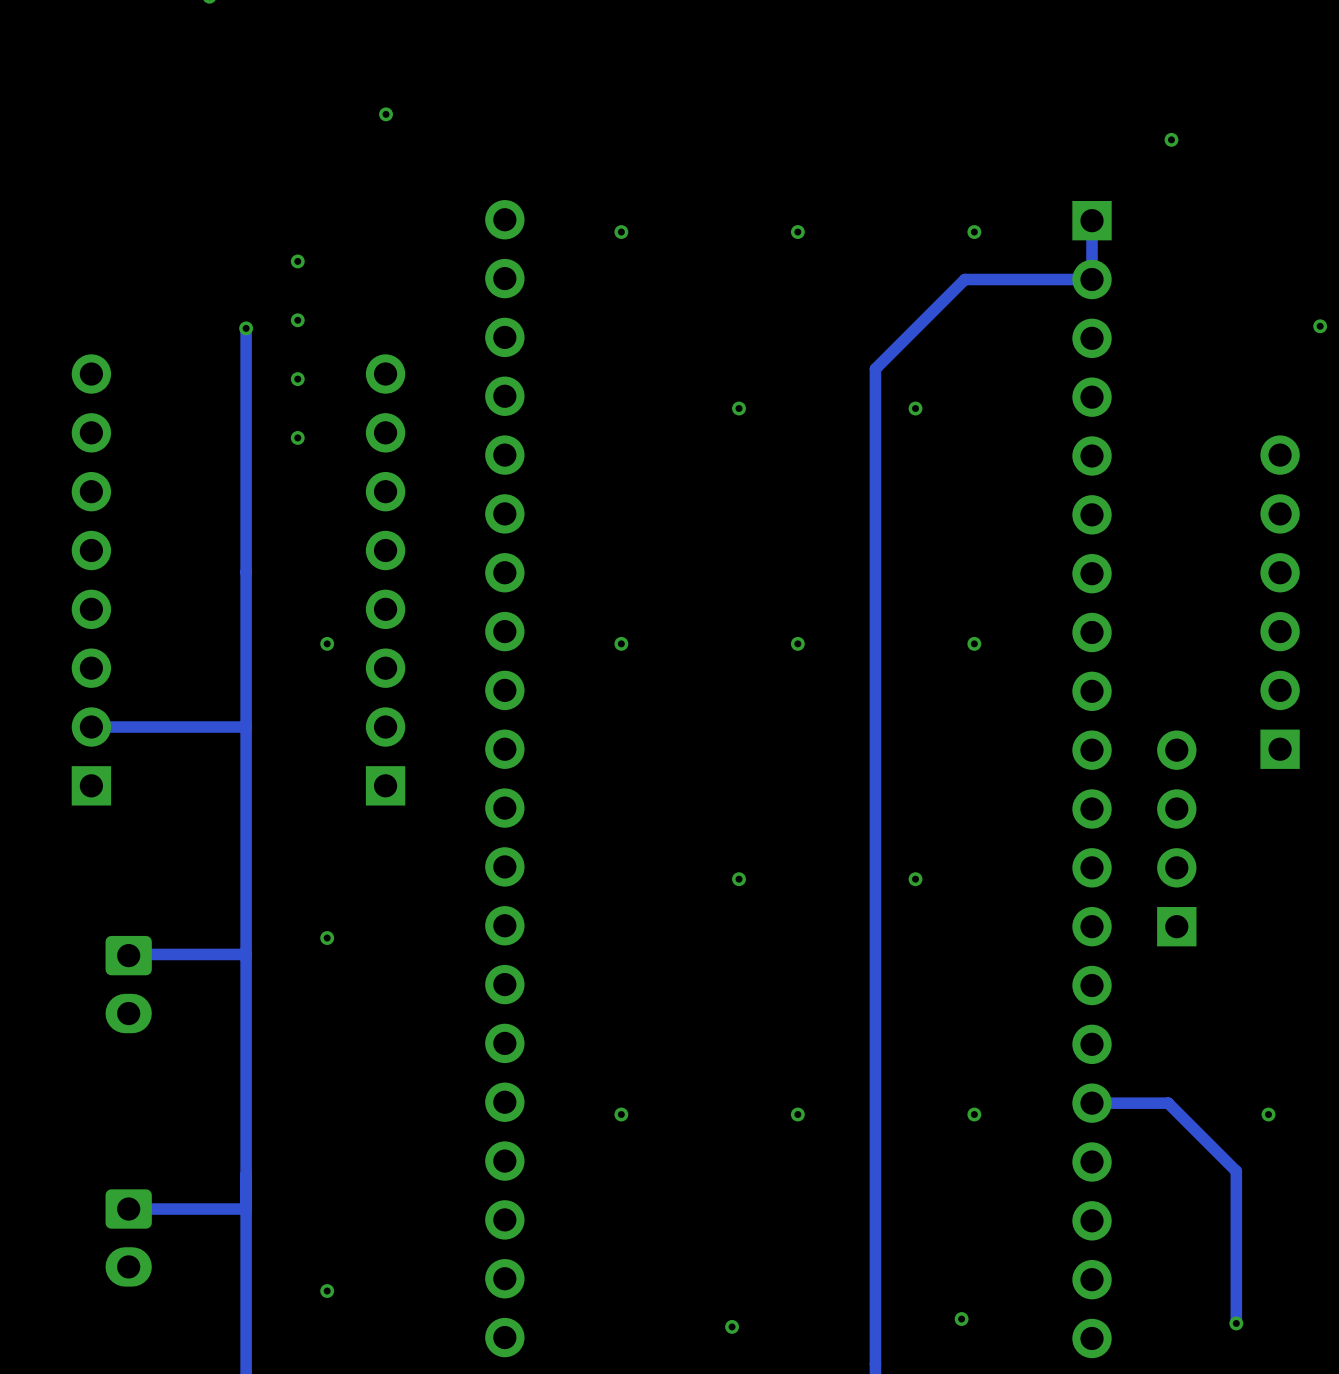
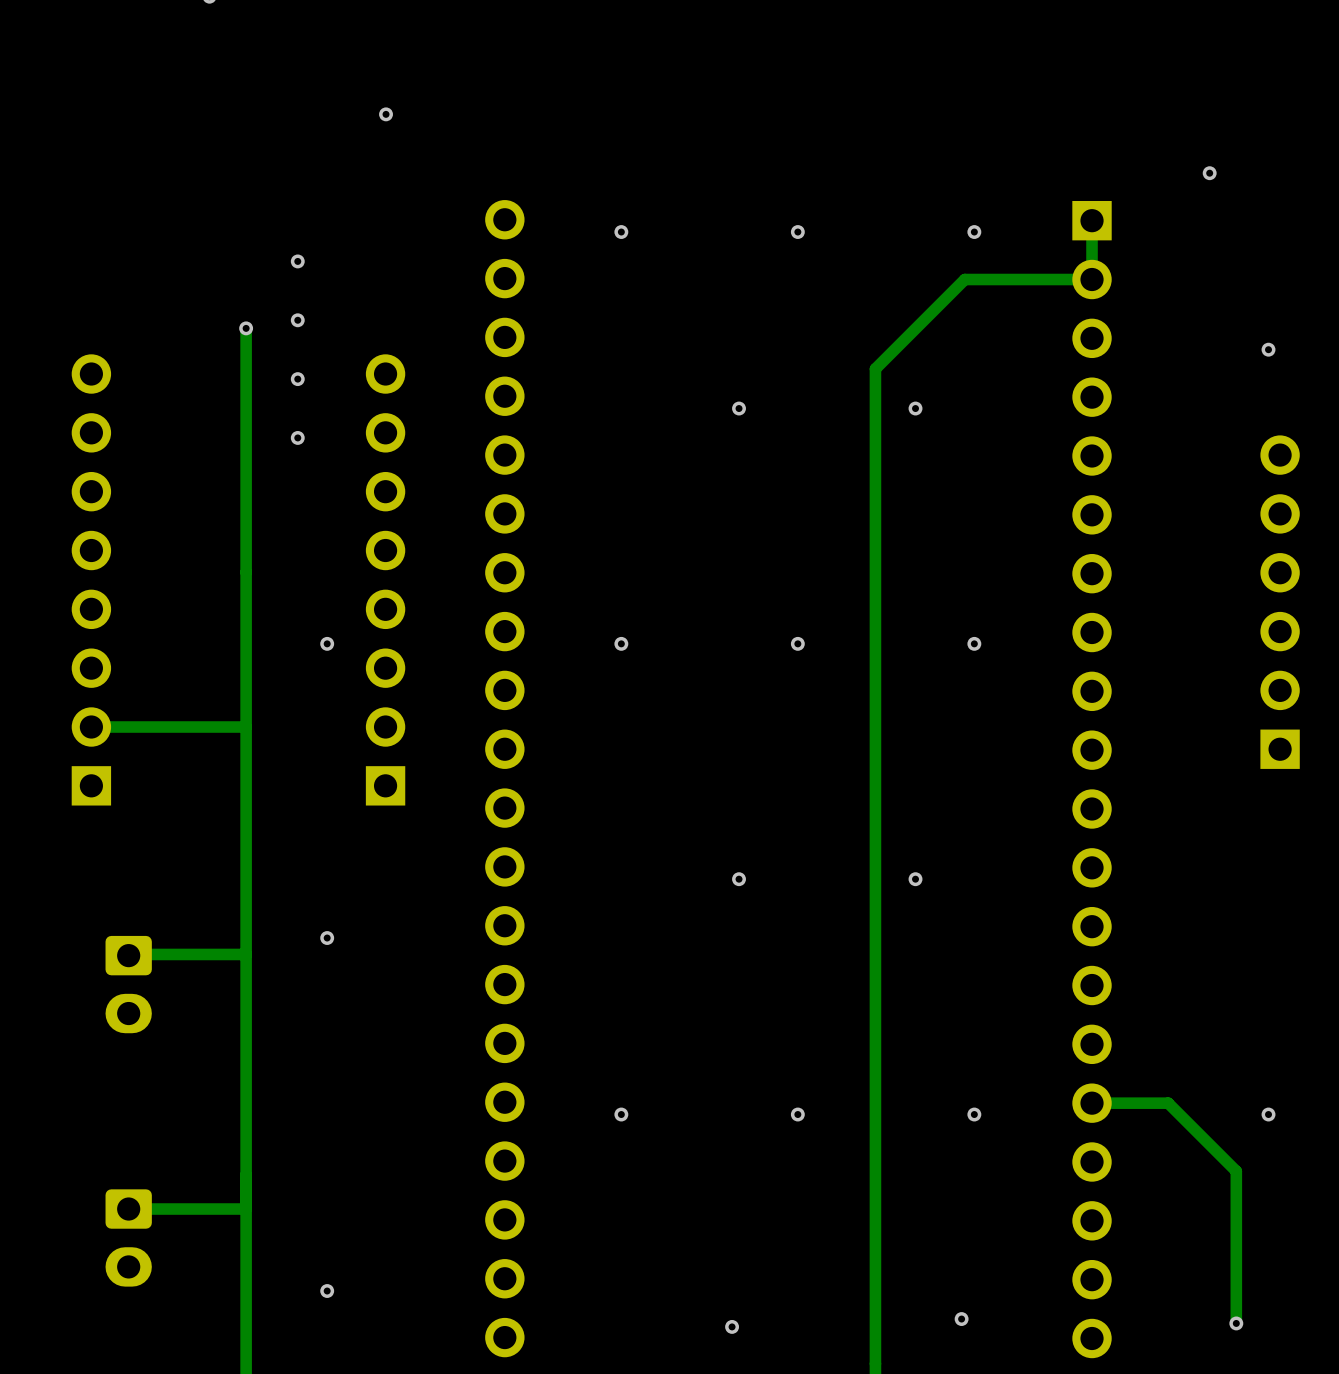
via position: (1171, 139) -> (1209, 173)
via position: (1320, 326) -> (1268, 349)
part: (1176, 838) -> none

